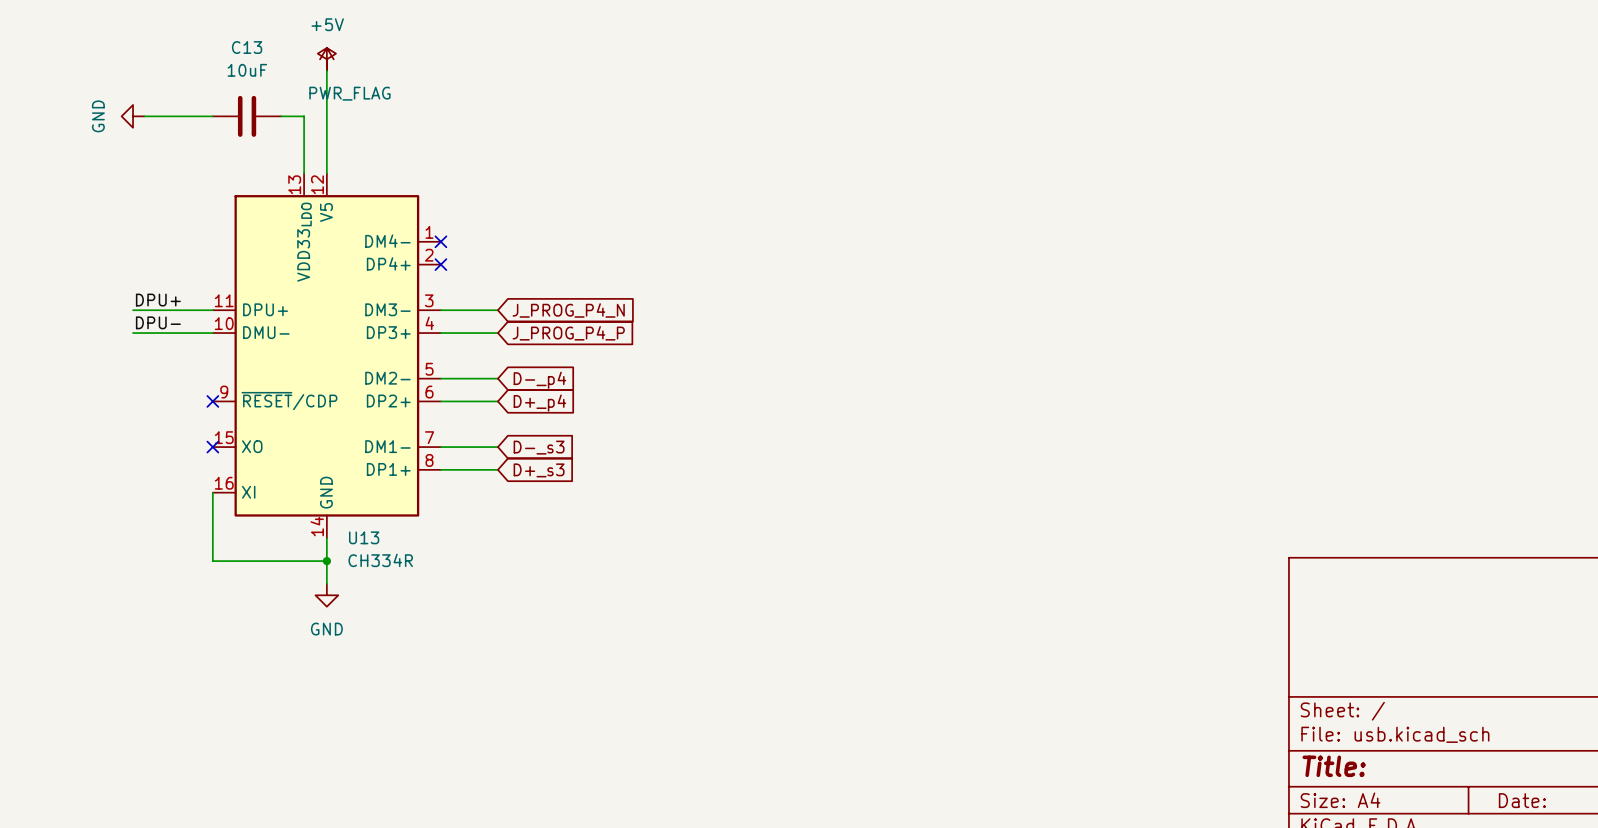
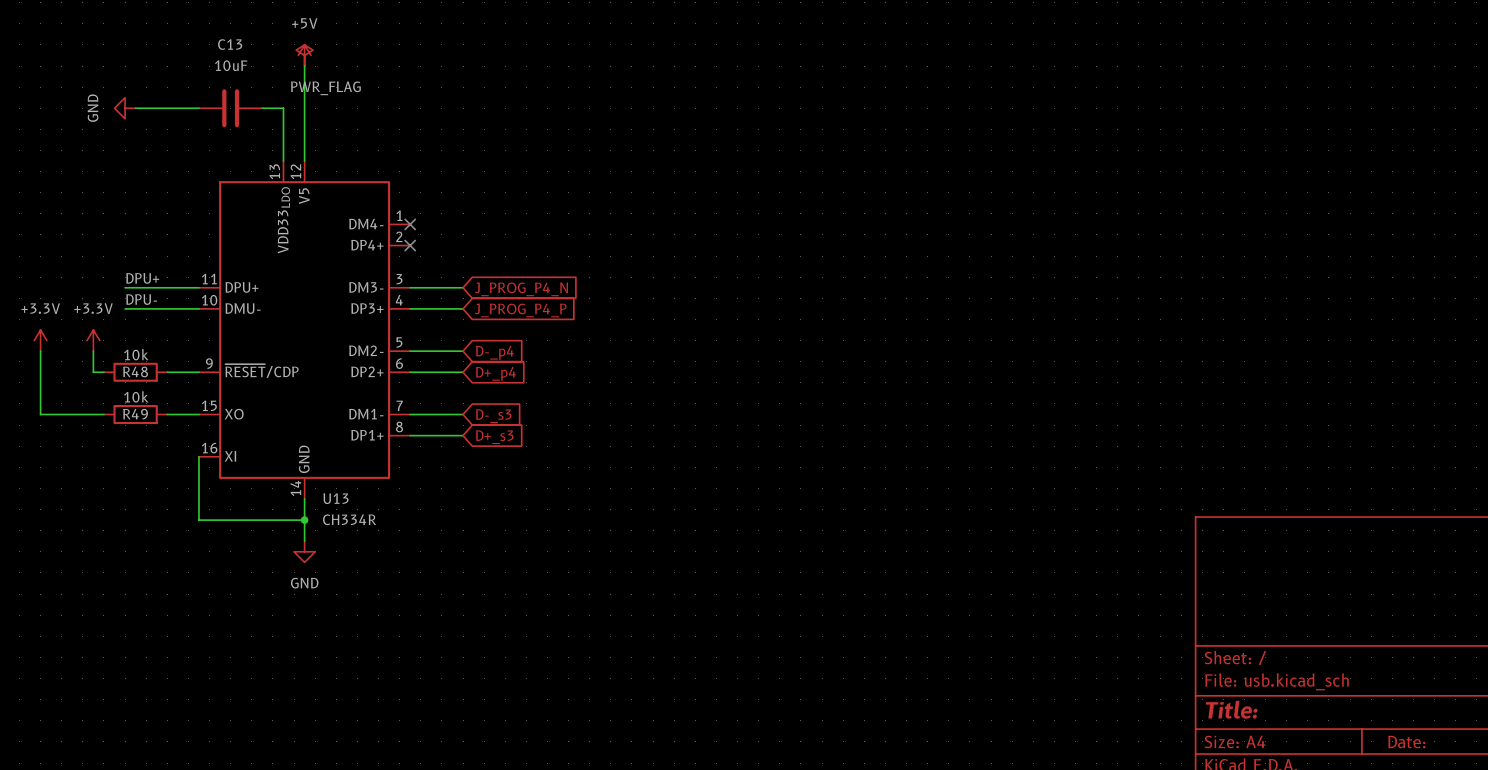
power symbol: none -> +3.3V (40, 340)
power symbol: none -> +3.3V (93, 340)
wire: none -> (40, 351) (40, 414) (103, 414)
wire: none -> (93, 351) (93, 372) (103, 372)
R48: none -> 10k (135, 372)
wire: none -> (167, 372) (198, 372)
no-connect mark: (212, 401) -> none
R49: none -> 10k (135, 414)
wire: none -> (167, 414) (198, 414)
no-connect mark: (212, 447) -> none

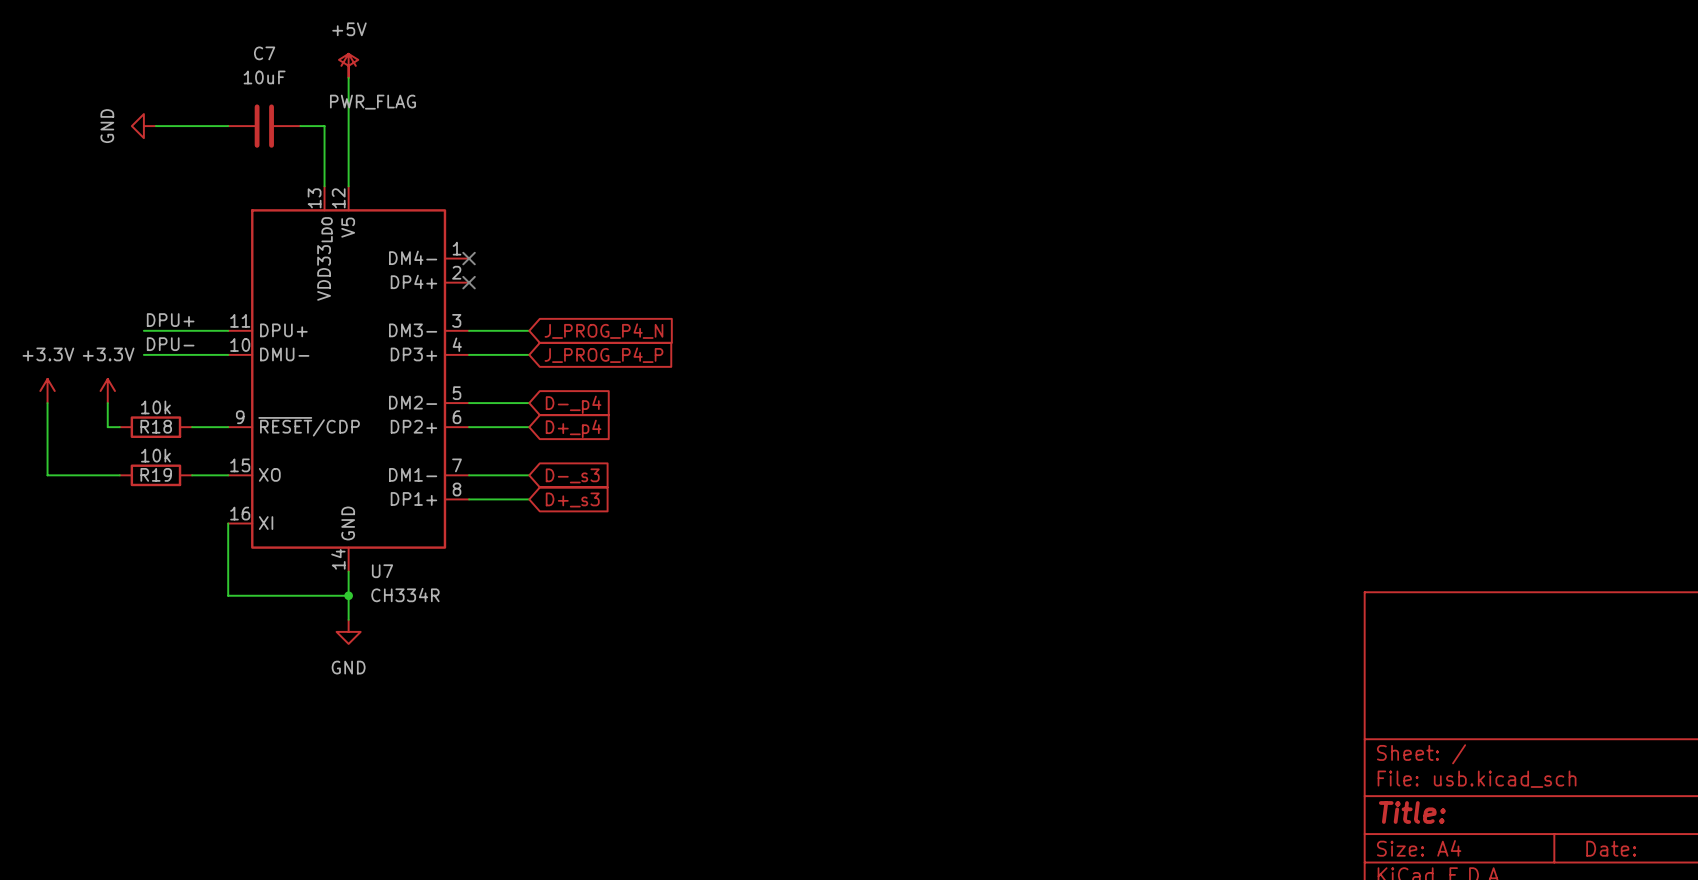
C13 name: C13 (230, 44) -> C7 (264, 53)
R48 name: R48 (135, 371) -> R18 (156, 426)
R49 name: R49 (135, 414) -> R19 (156, 474)
U13 name: U13 (336, 498) -> U7 (382, 571)

